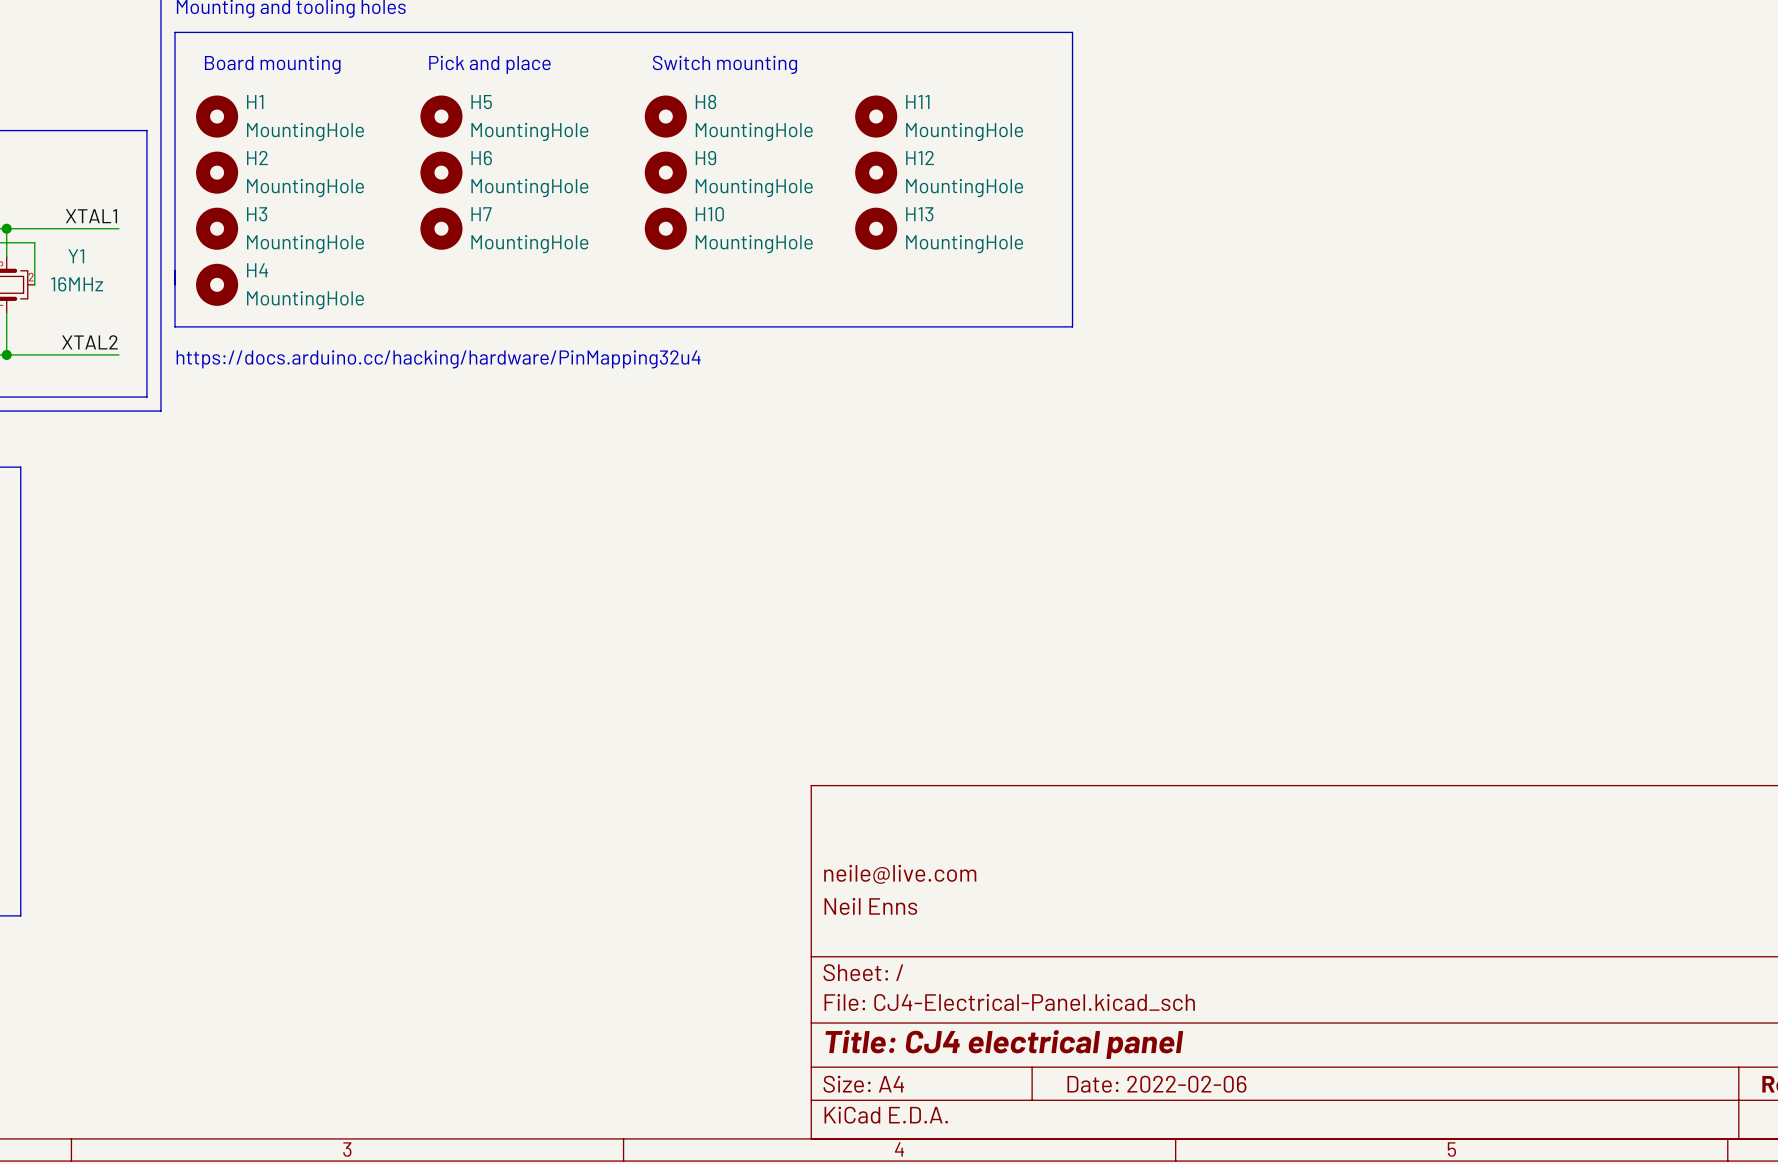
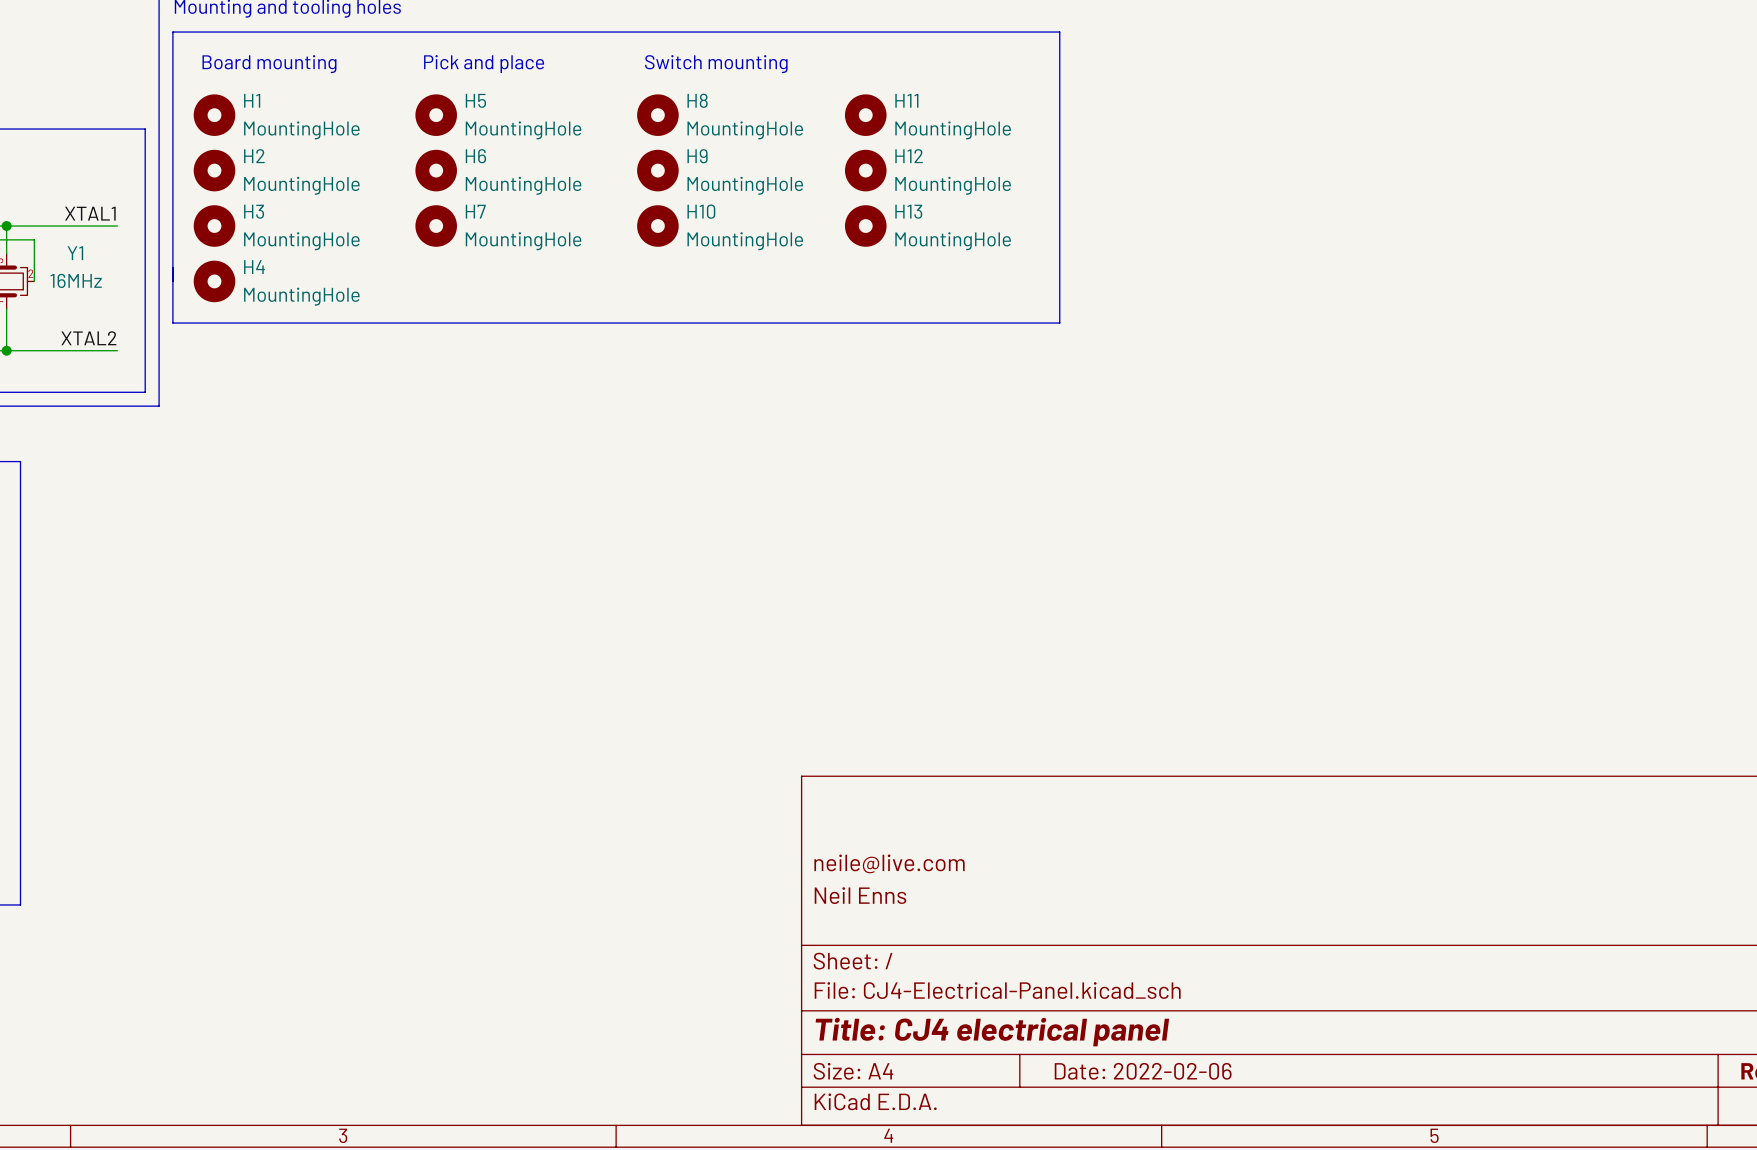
text: https://docs.arduino.cc/hacking/hardware/PinMapping32u4 (438, 359) -> none

